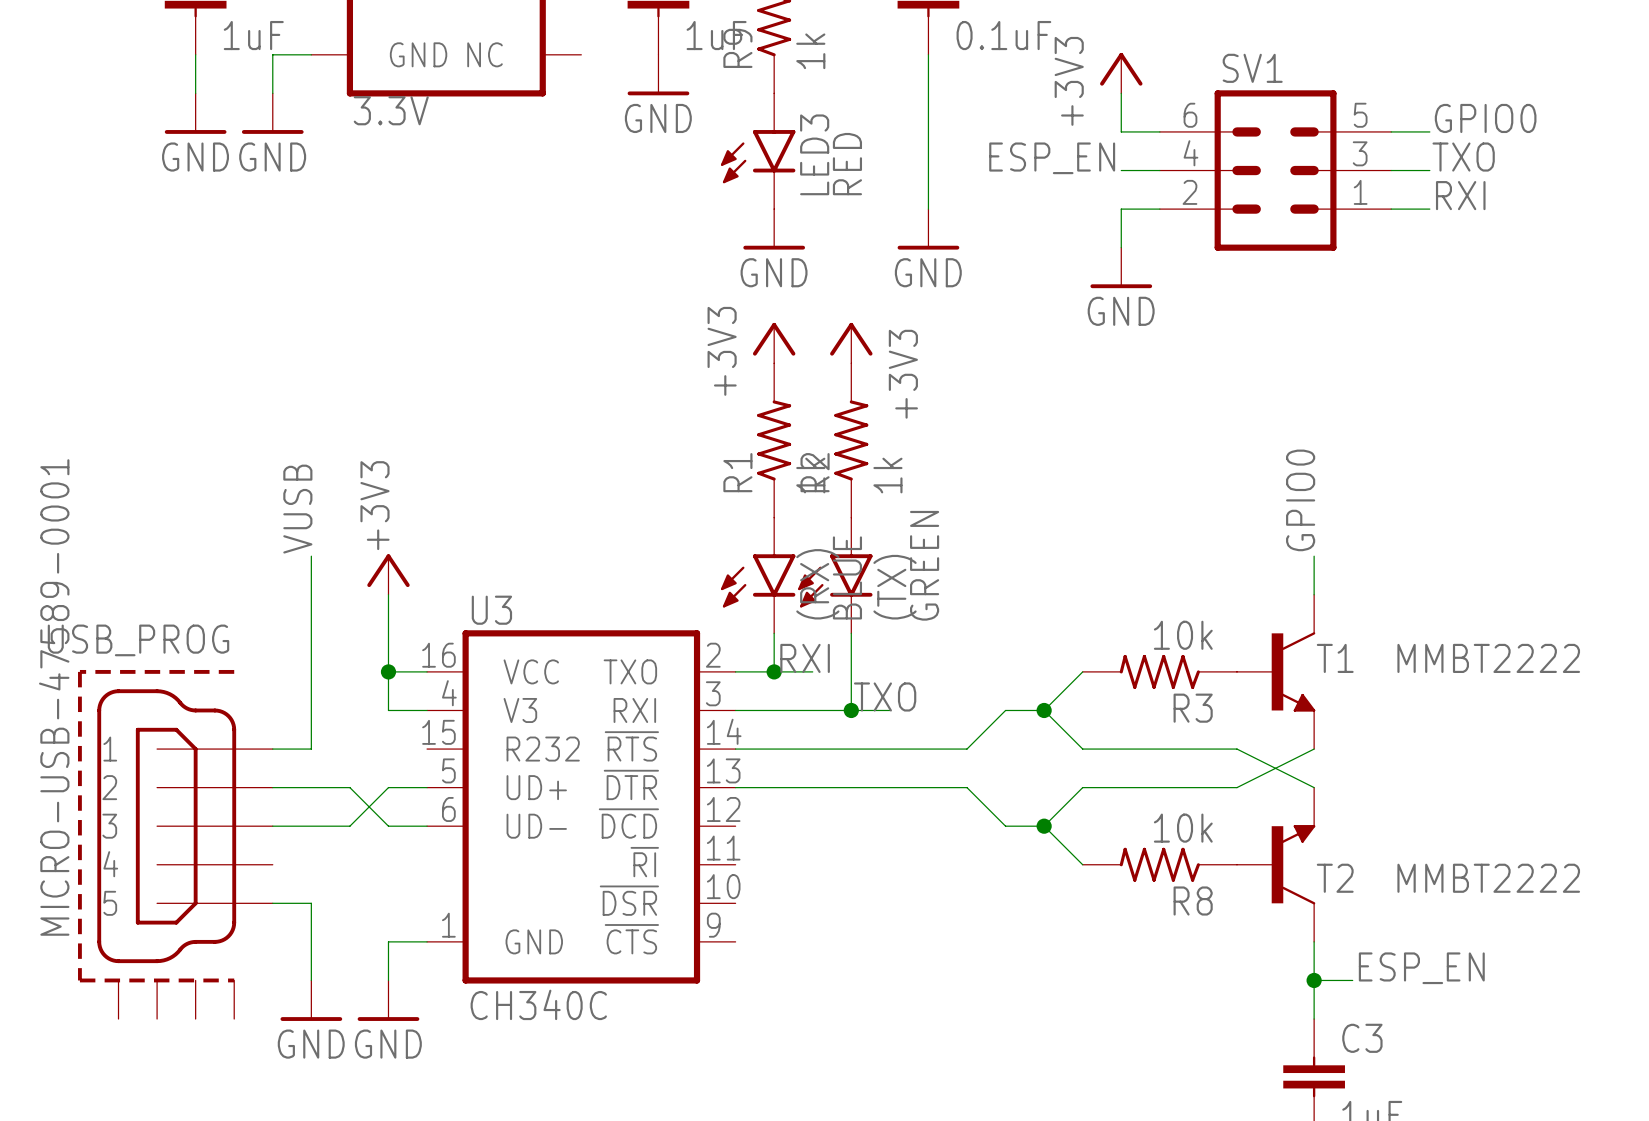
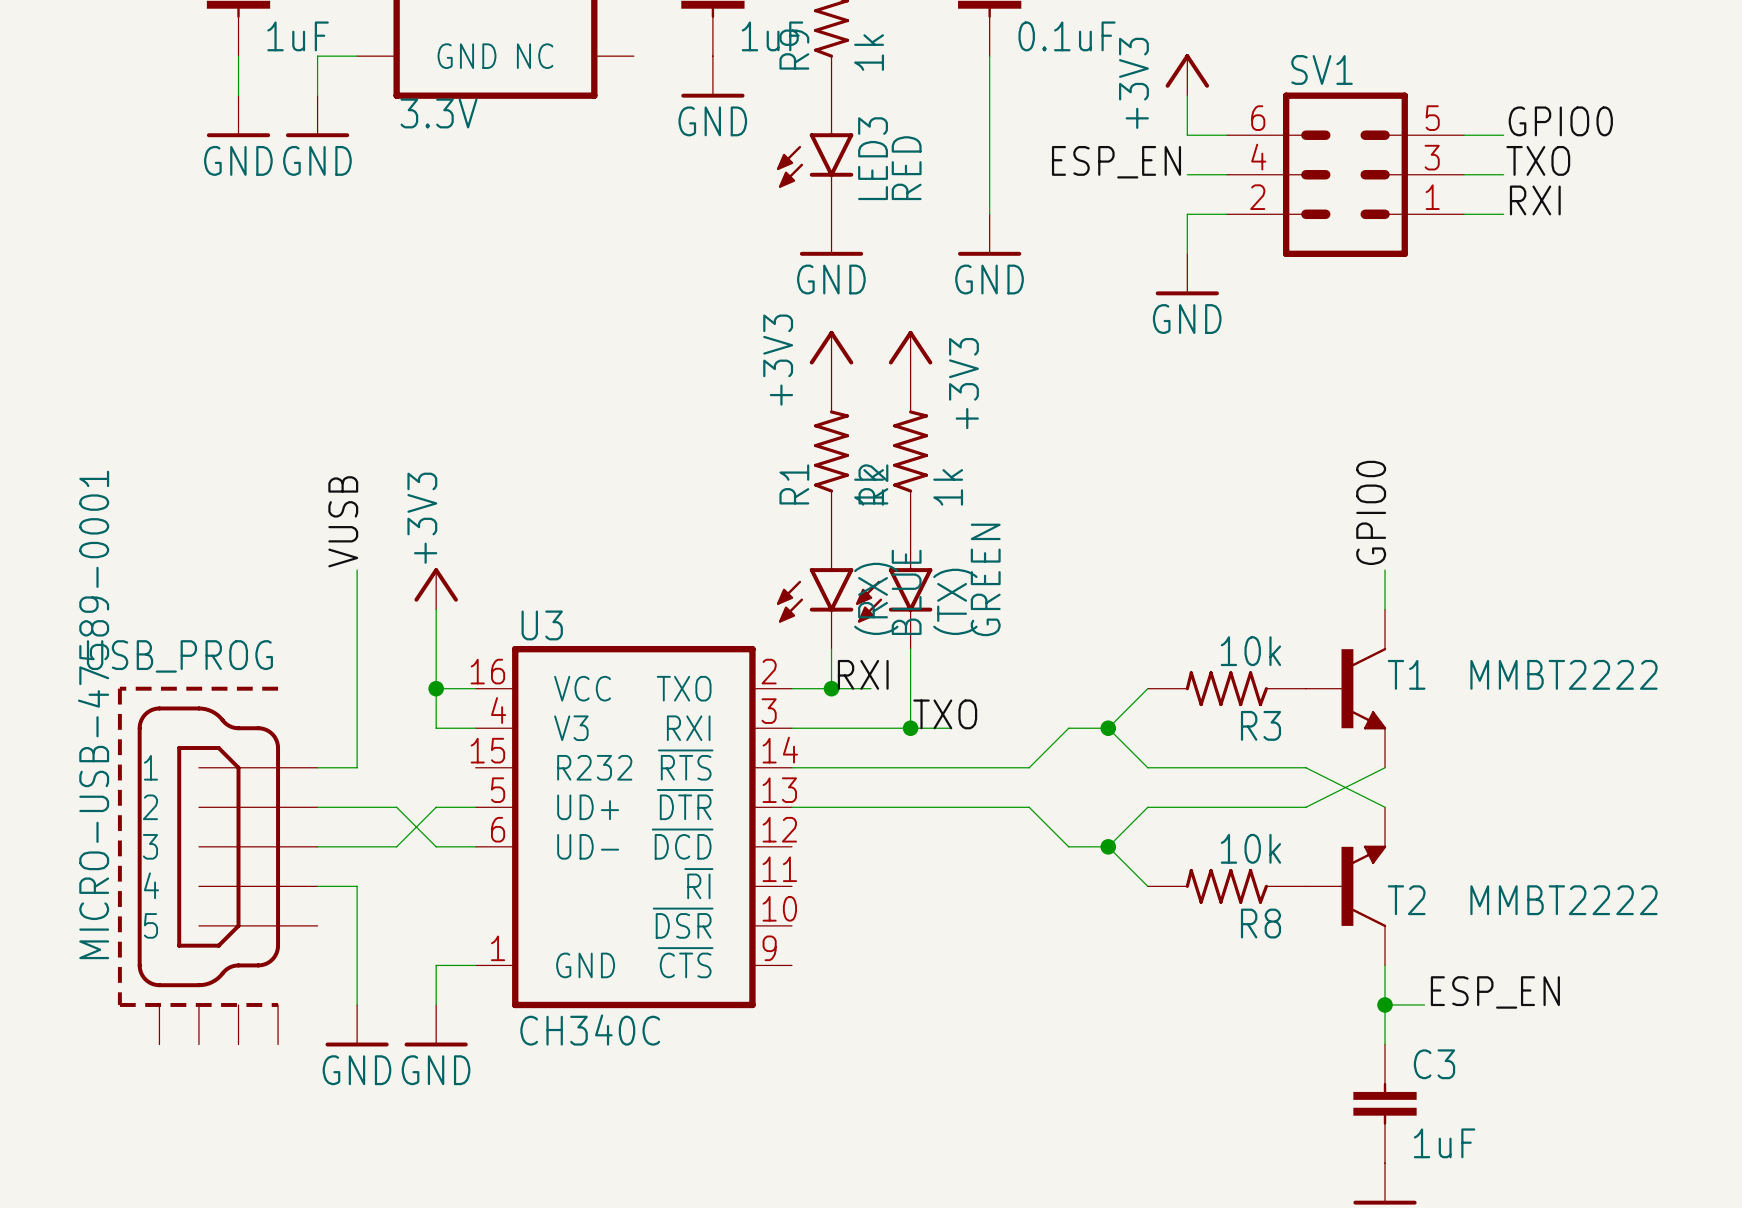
wire: (272, 903) (311, 903) -> (317, 886) (357, 886) (357, 925)

